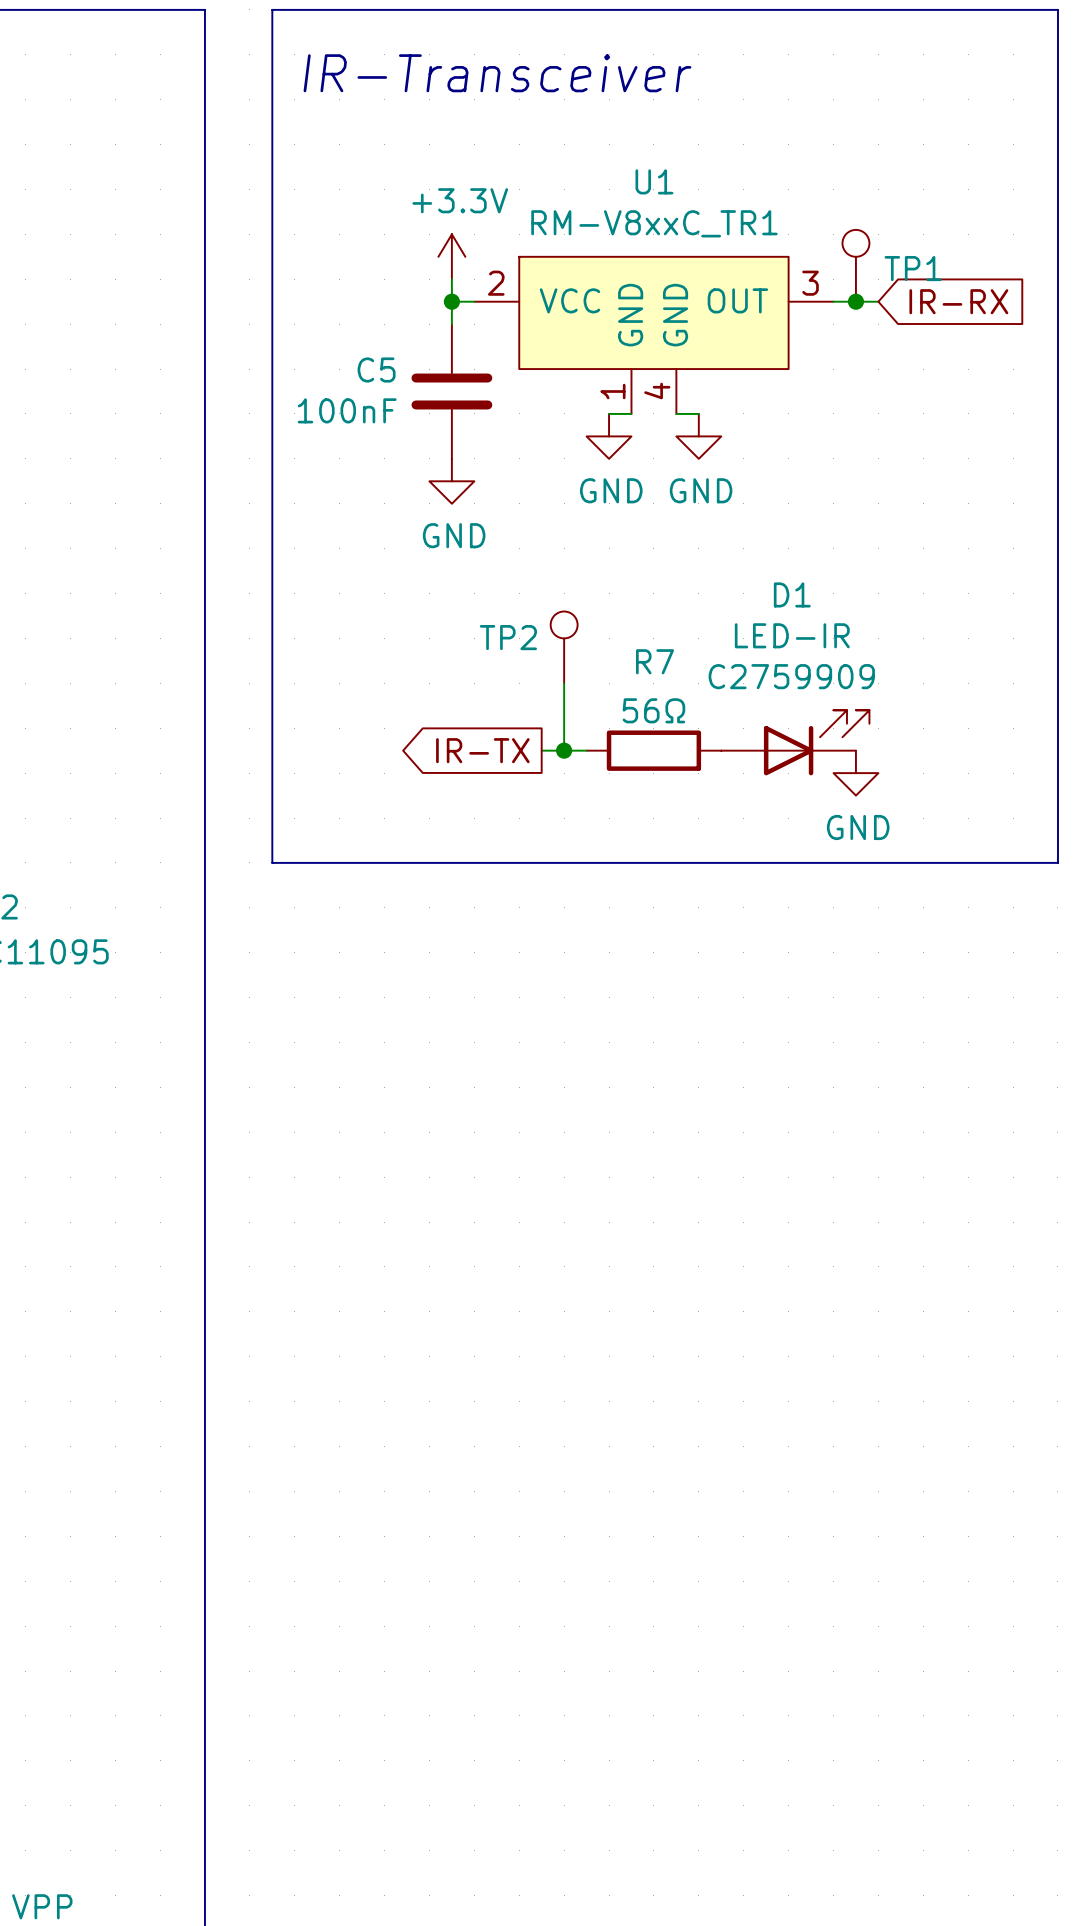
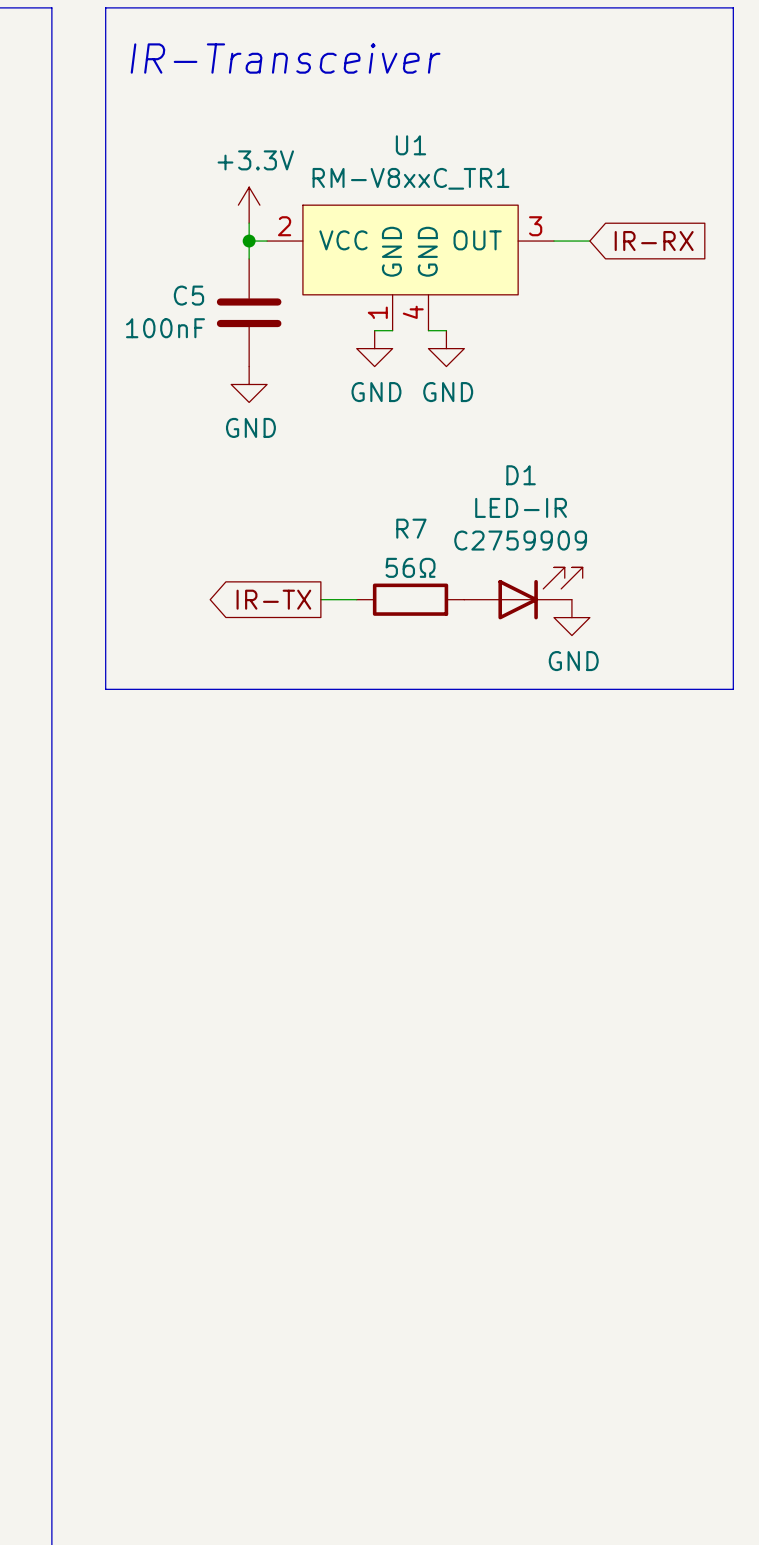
TP1: (855, 265) -> none
junction: (855, 301) -> none
TP2: (564, 647) -> none
wire: (564, 683) (564, 750) -> none
junction: (564, 750) -> none

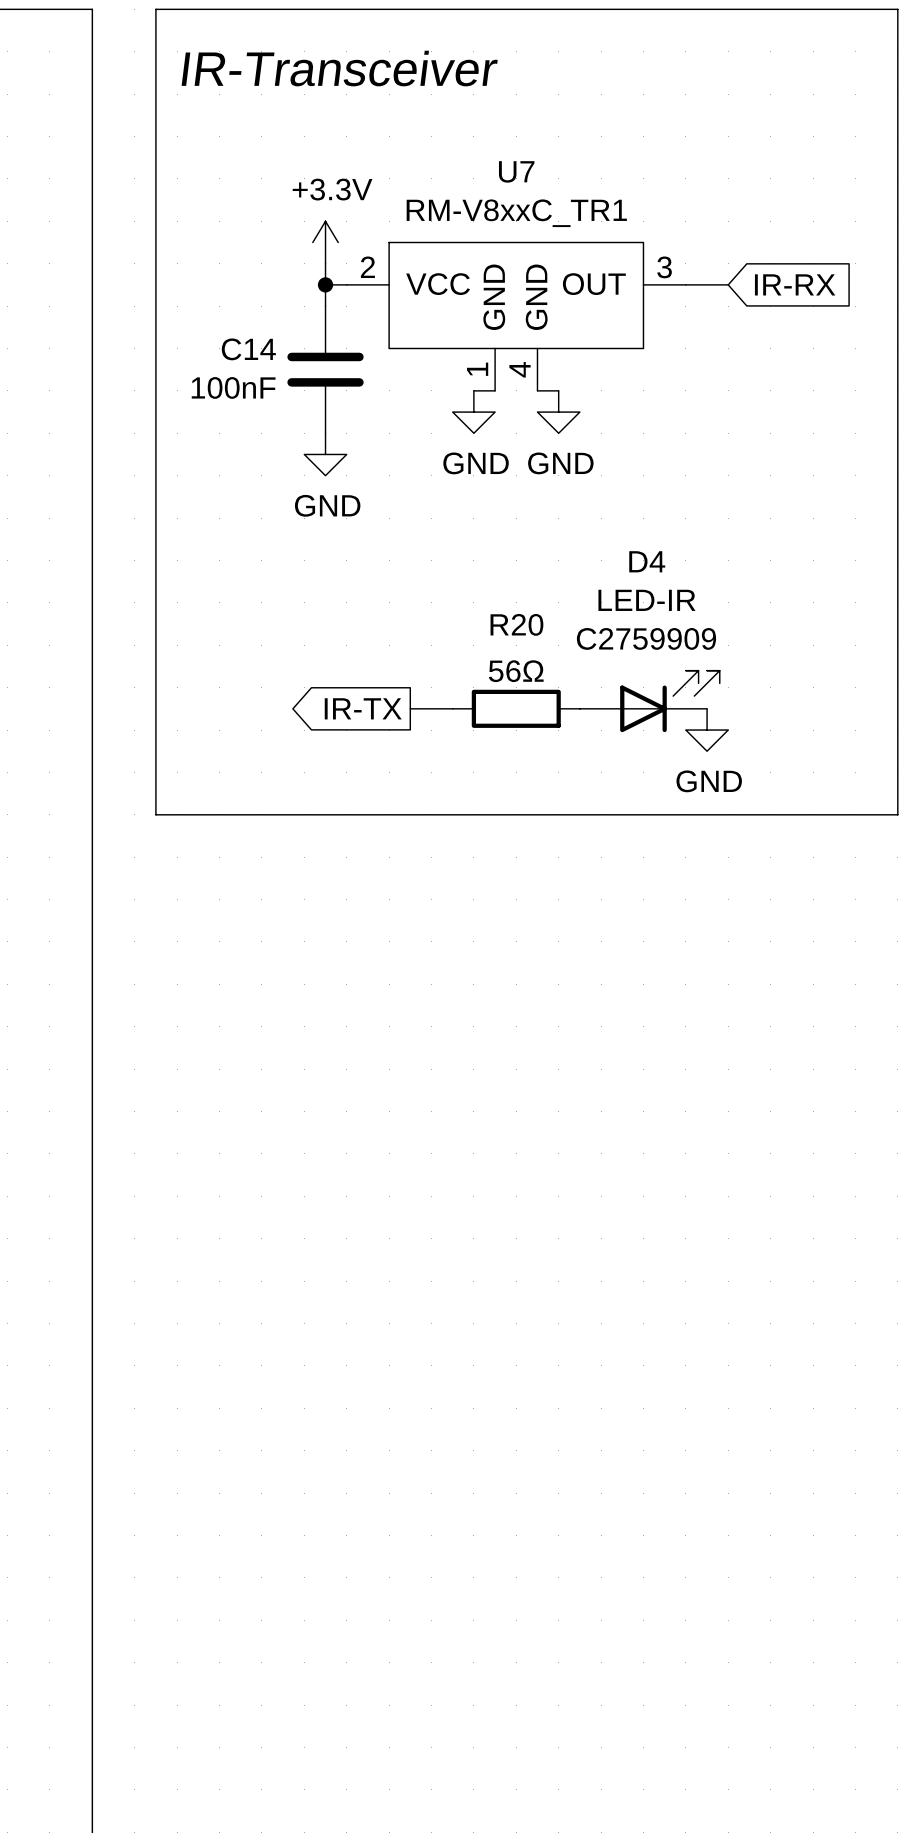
U1 name: U1 (410, 145) -> U7 (516, 171)
C5 name: C5 (188, 295) -> C14 (248, 349)
D1 name: D1 (521, 475) -> D4 (647, 561)
R7 name: R7 (411, 528) -> R20 (516, 624)

